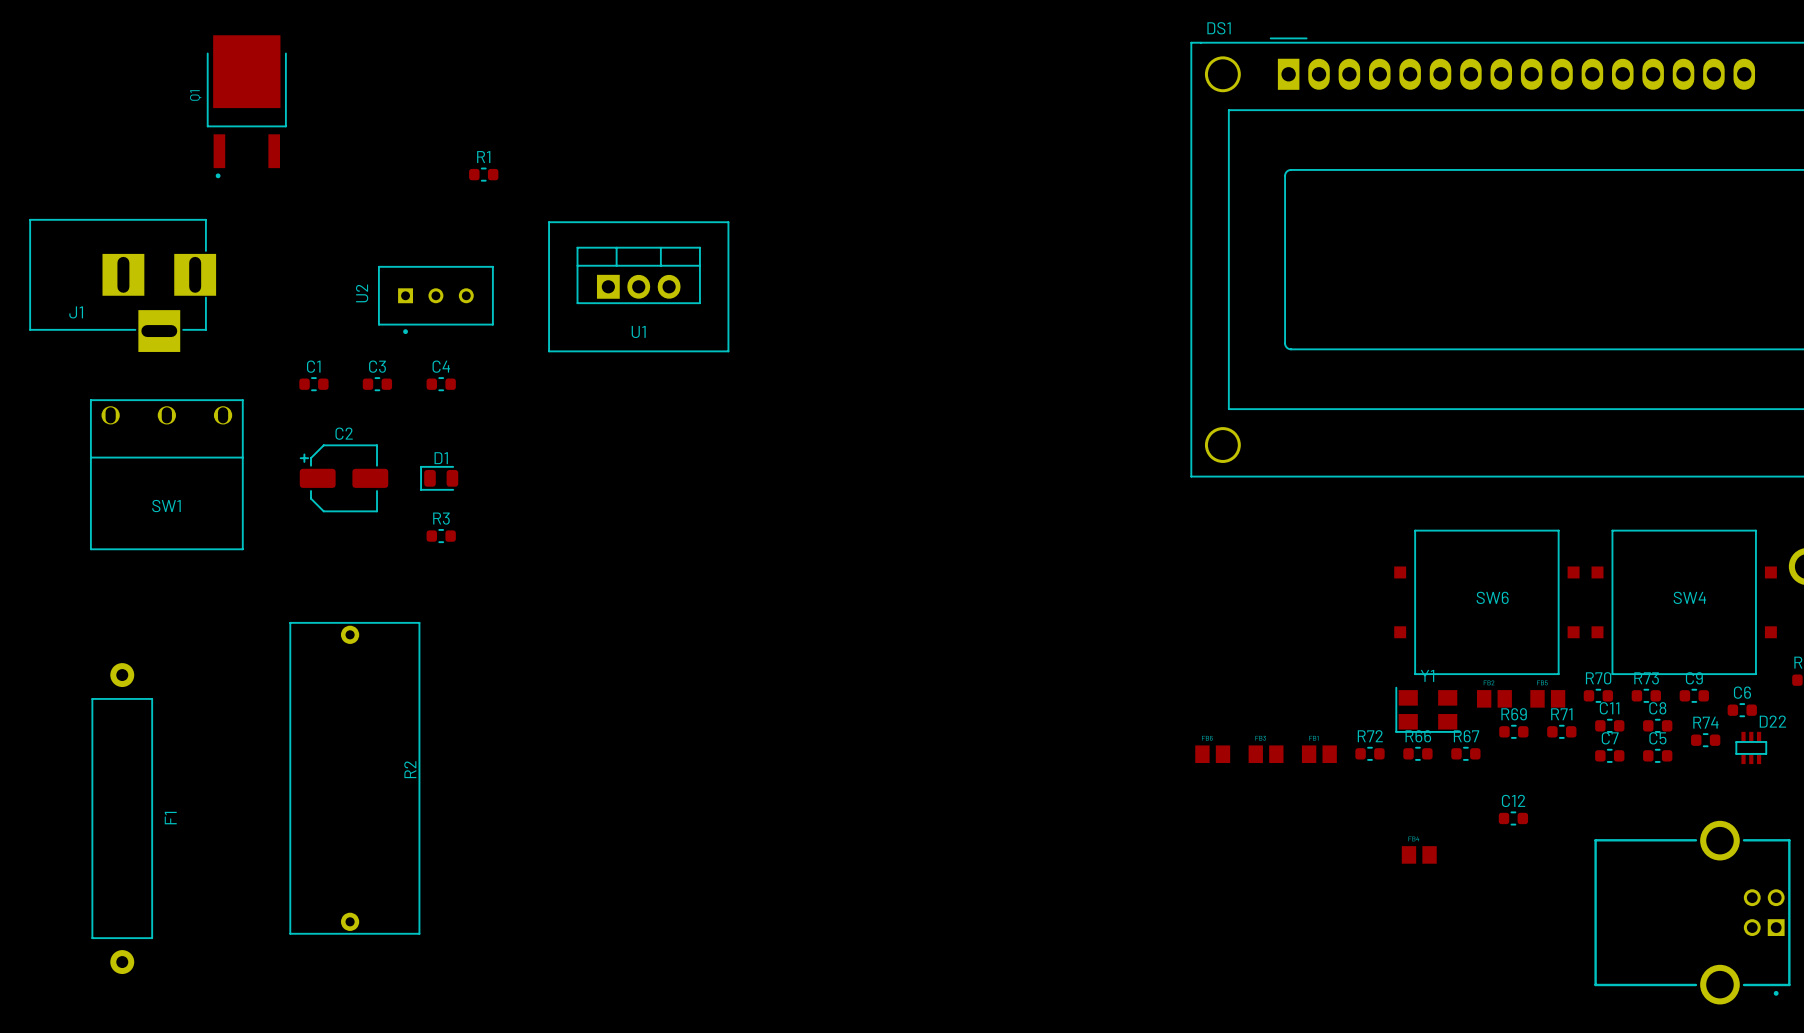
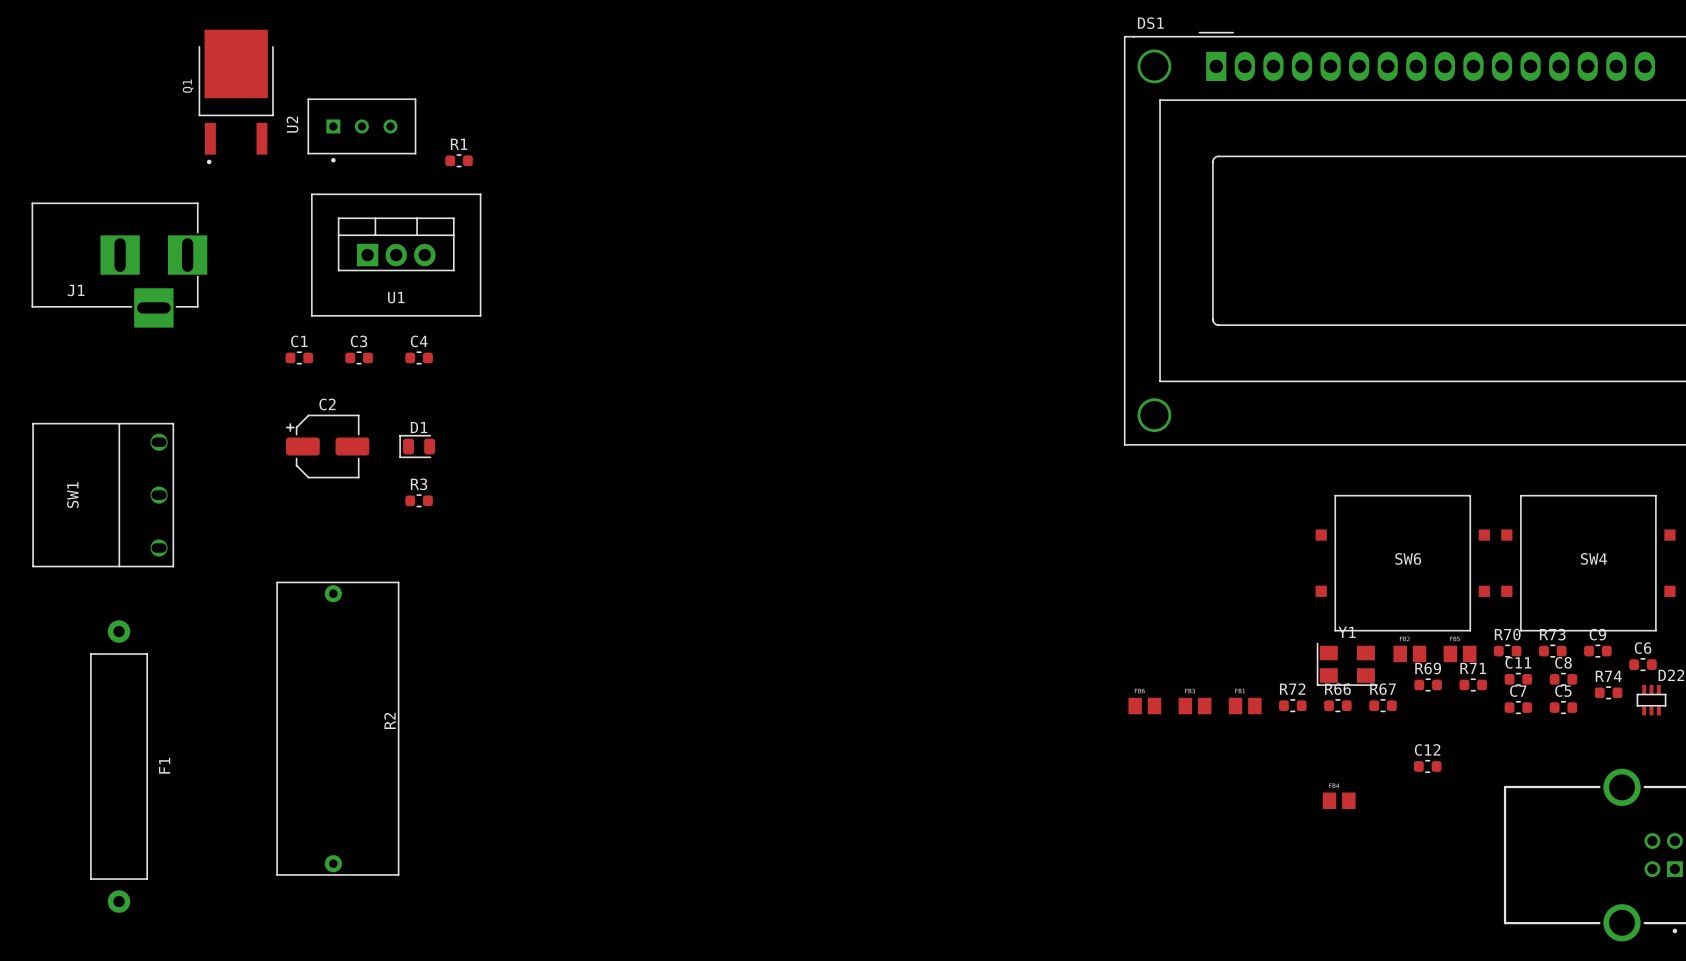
U1 position: (638, 286) -> (396, 255)
U2 position: (435, 300) -> (361, 130)
SW1 rotation: 0° (166, 474) -> 90° clockwise (103, 495)

